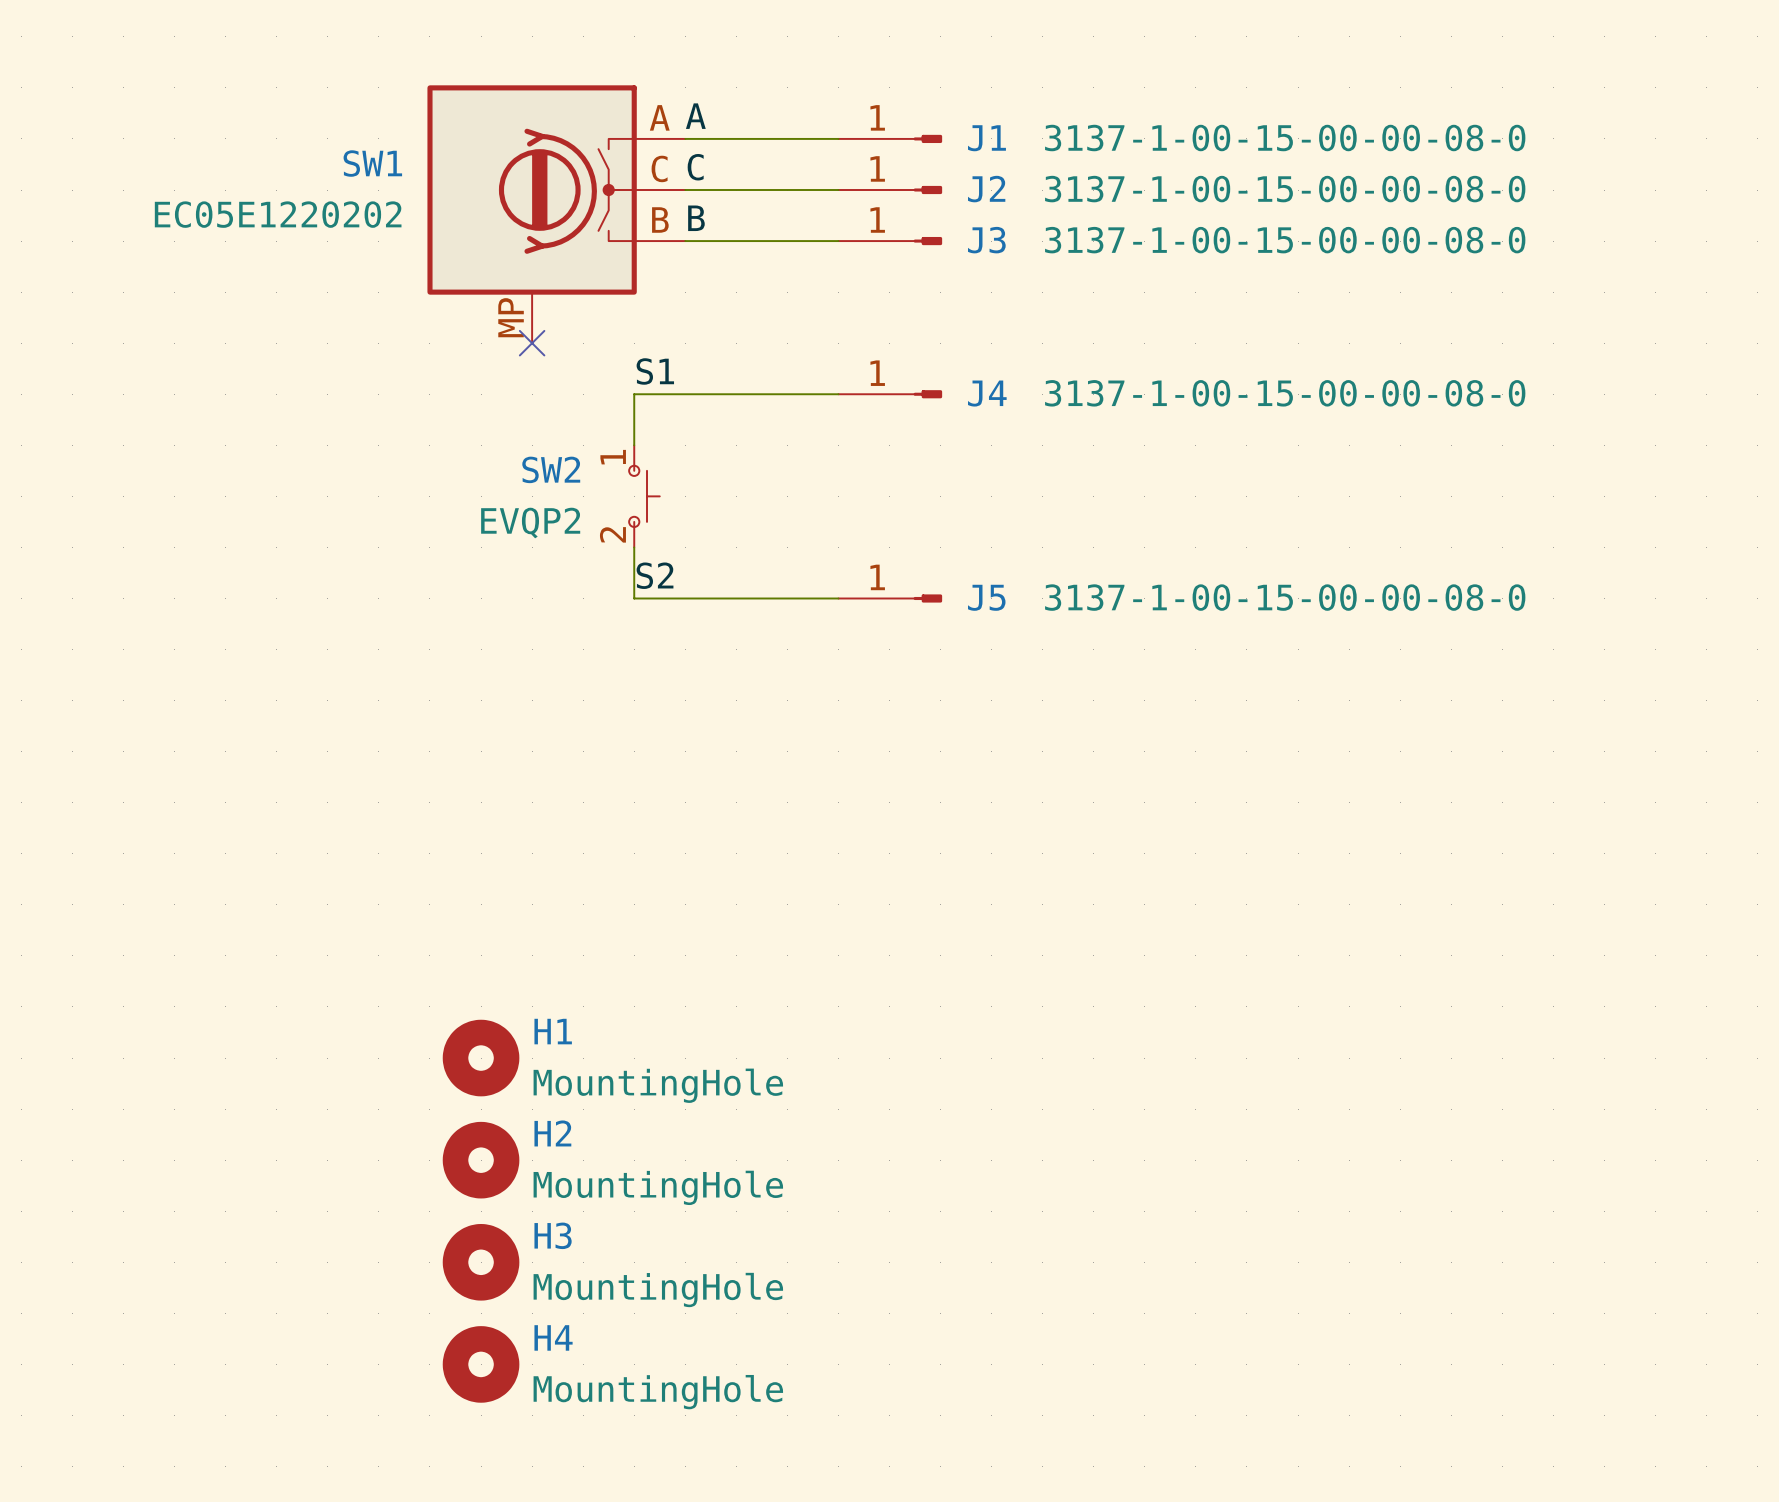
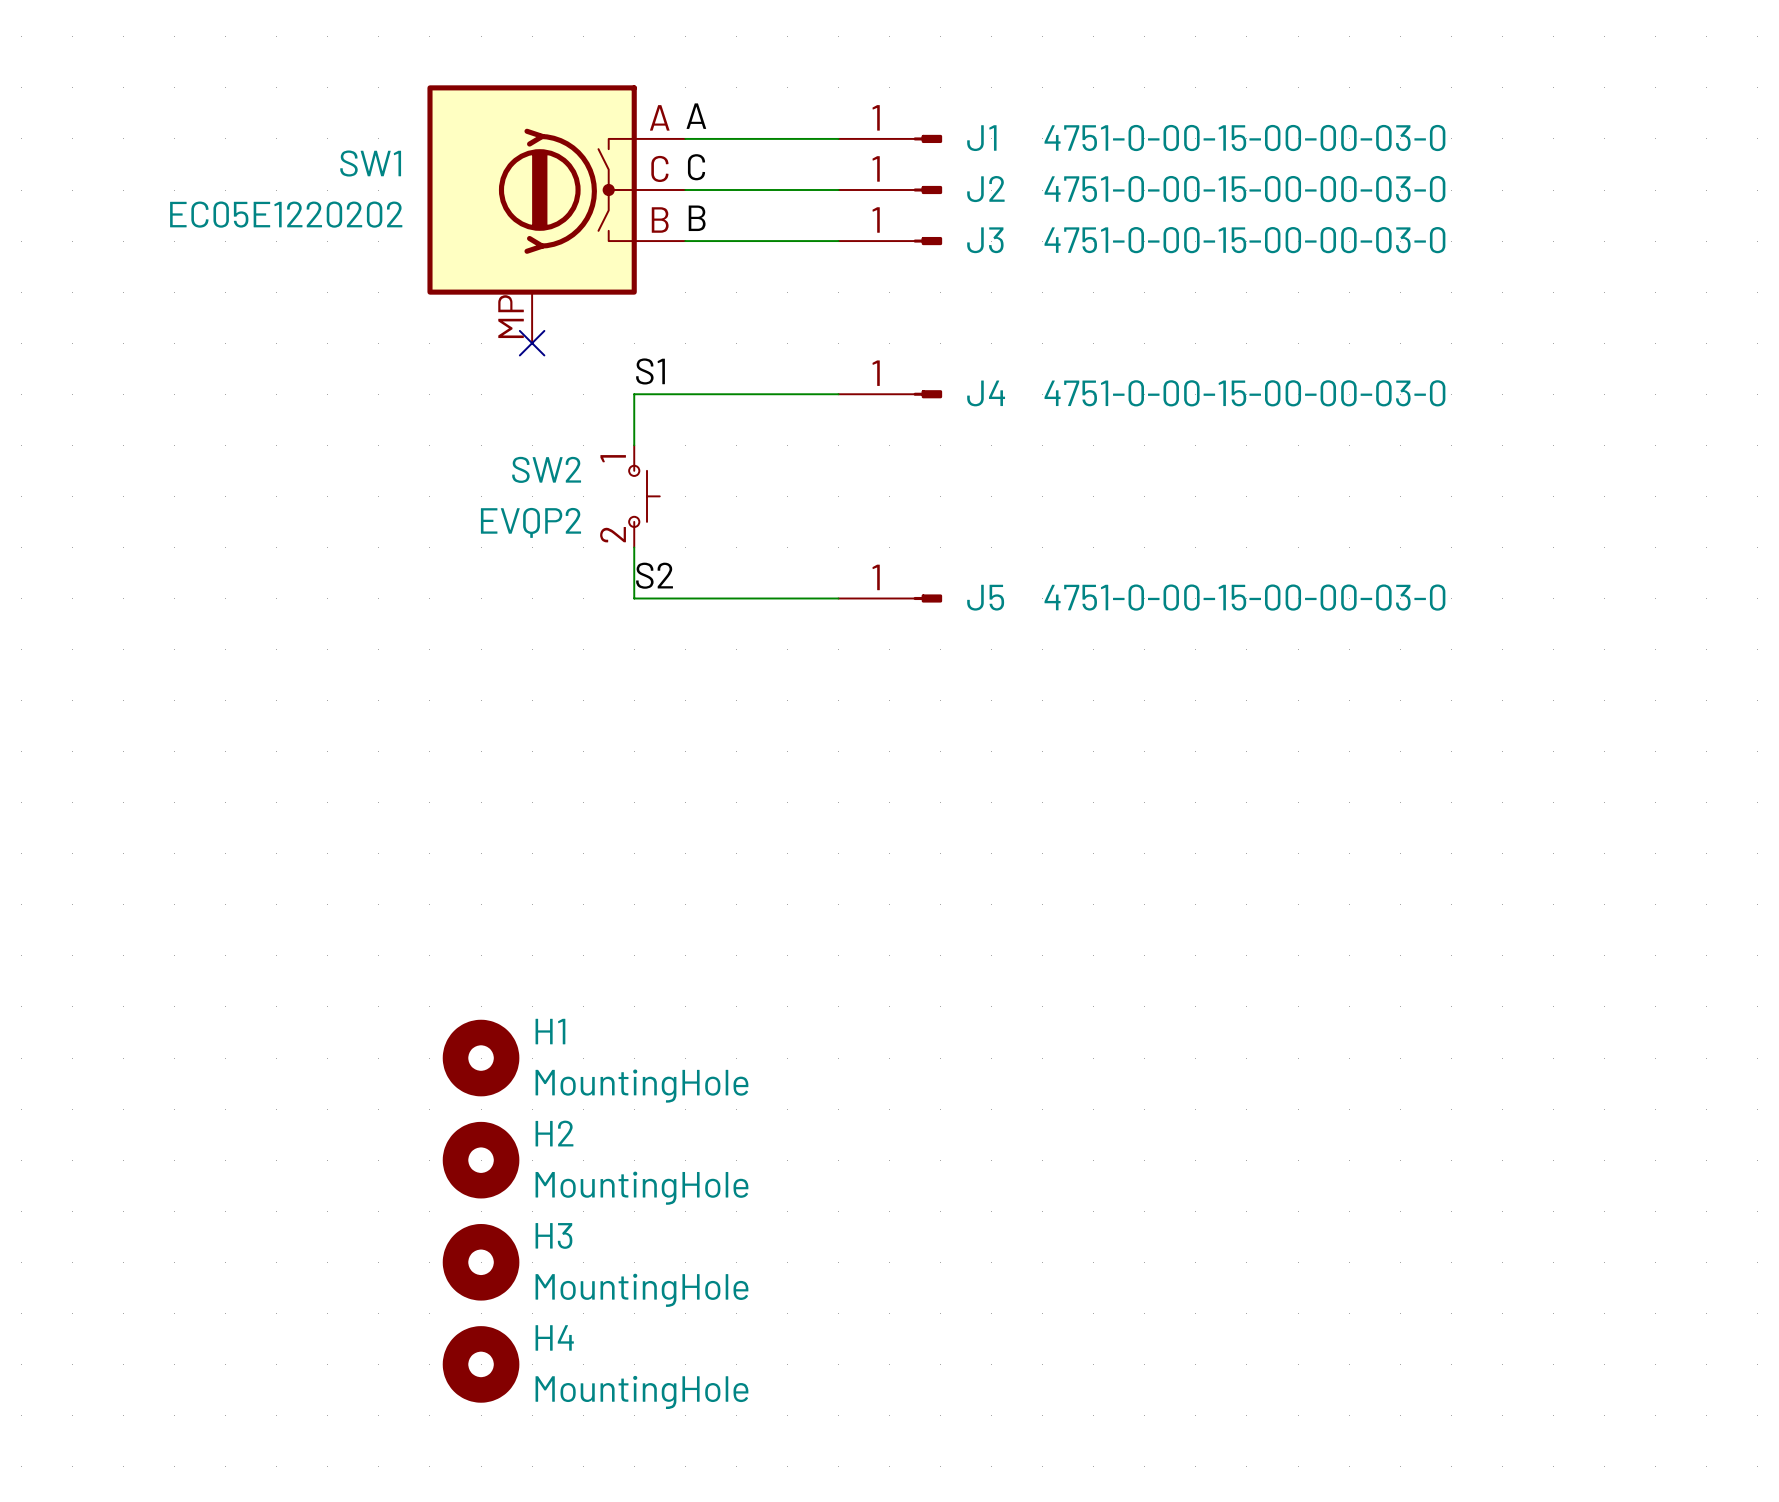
J1 value: 3137-1-00-15-00-00-08-0 (1285, 138) -> 4751-0-00-15-00-00-03-0 (1244, 138)
J2 value: 3137-1-00-15-00-00-08-0 (1285, 189) -> 4751-0-00-15-00-00-03-0 (1244, 189)
J3 value: 3137-1-00-15-00-00-08-0 (1285, 240) -> 4751-0-00-15-00-00-03-0 (1244, 240)
J4 value: 3137-1-00-15-00-00-08-0 (1285, 393) -> 4751-0-00-15-00-00-03-0 (1244, 393)
J5 value: 3137-1-00-15-00-00-08-0 (1285, 597) -> 4751-0-00-15-00-00-03-0 (1244, 597)

